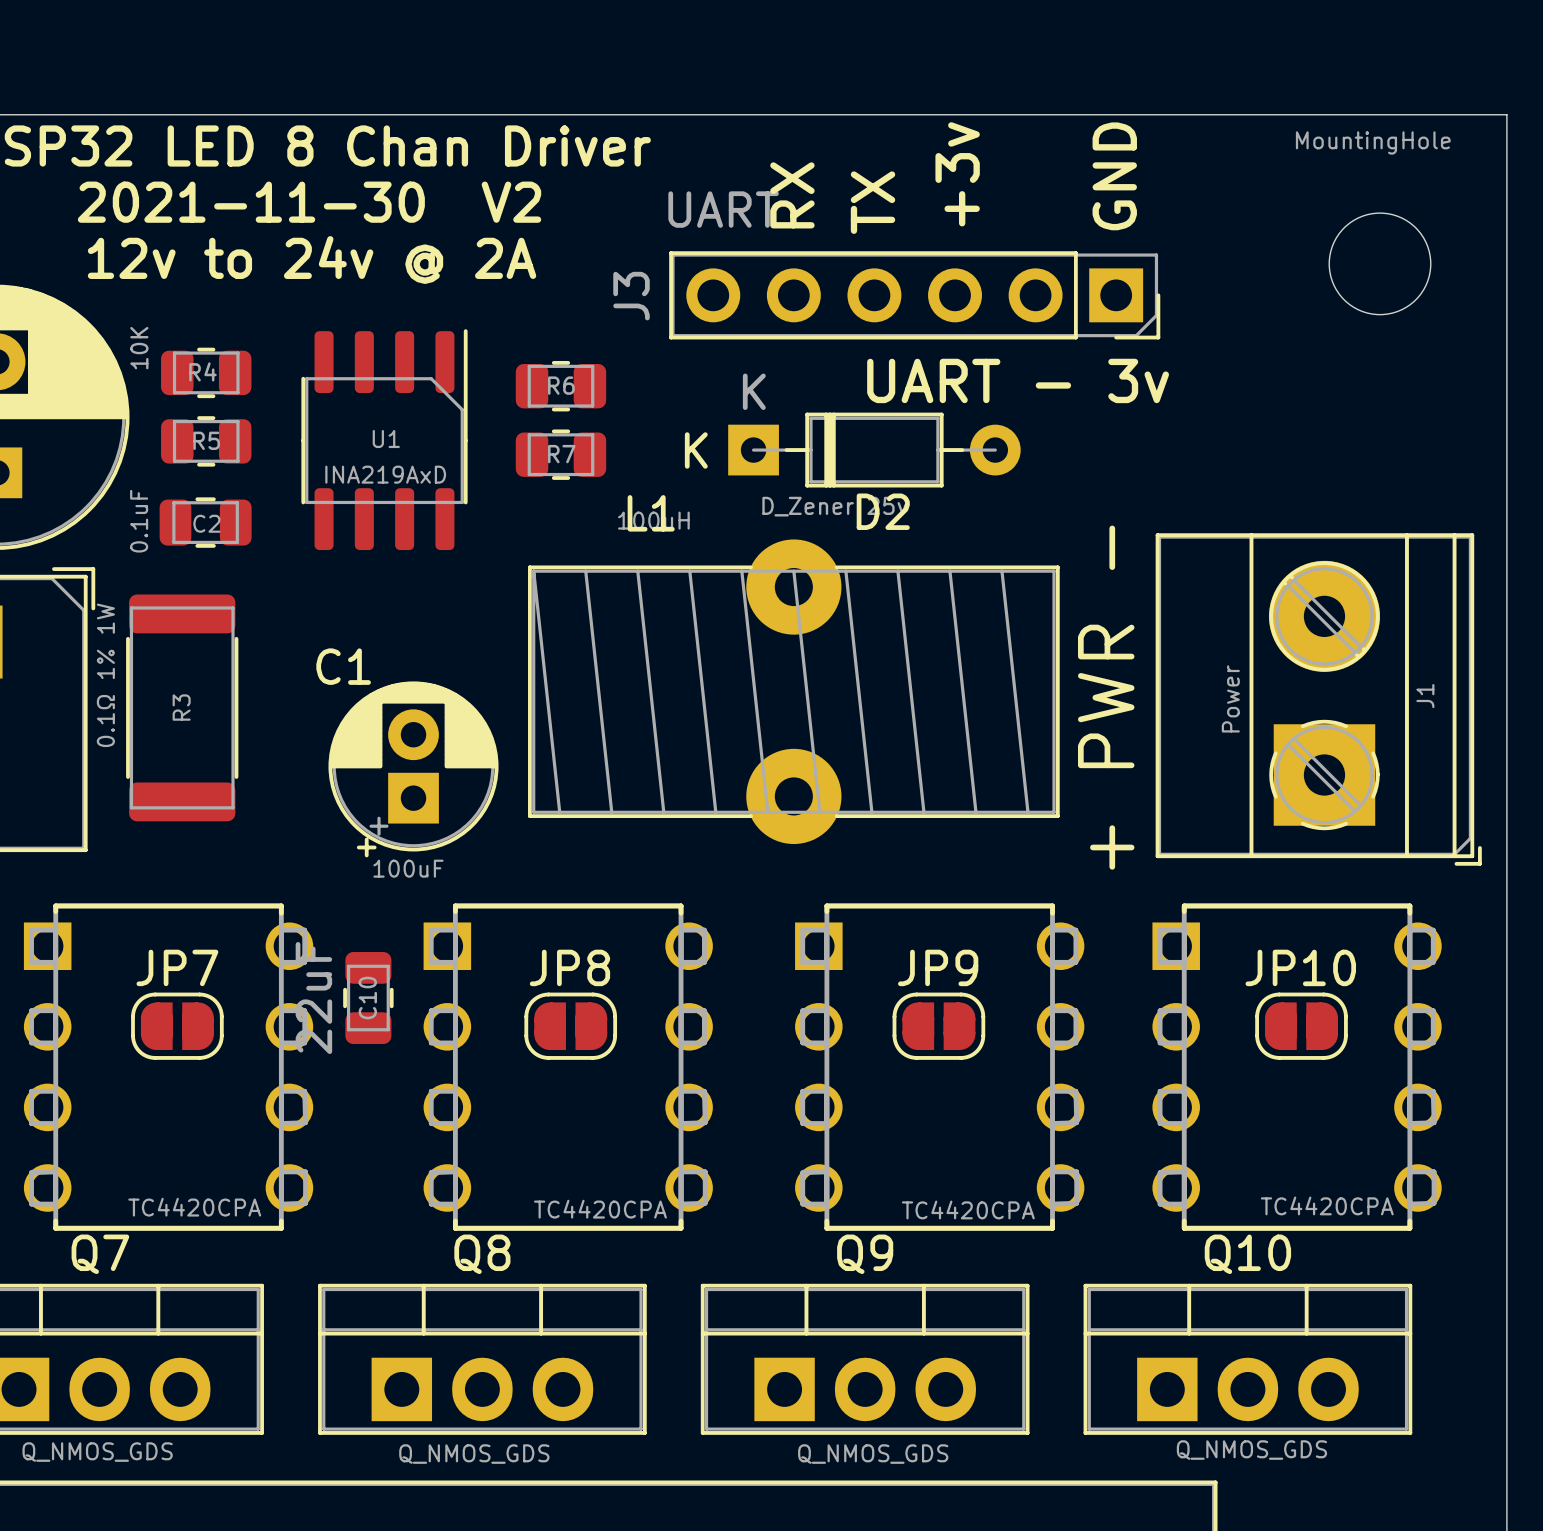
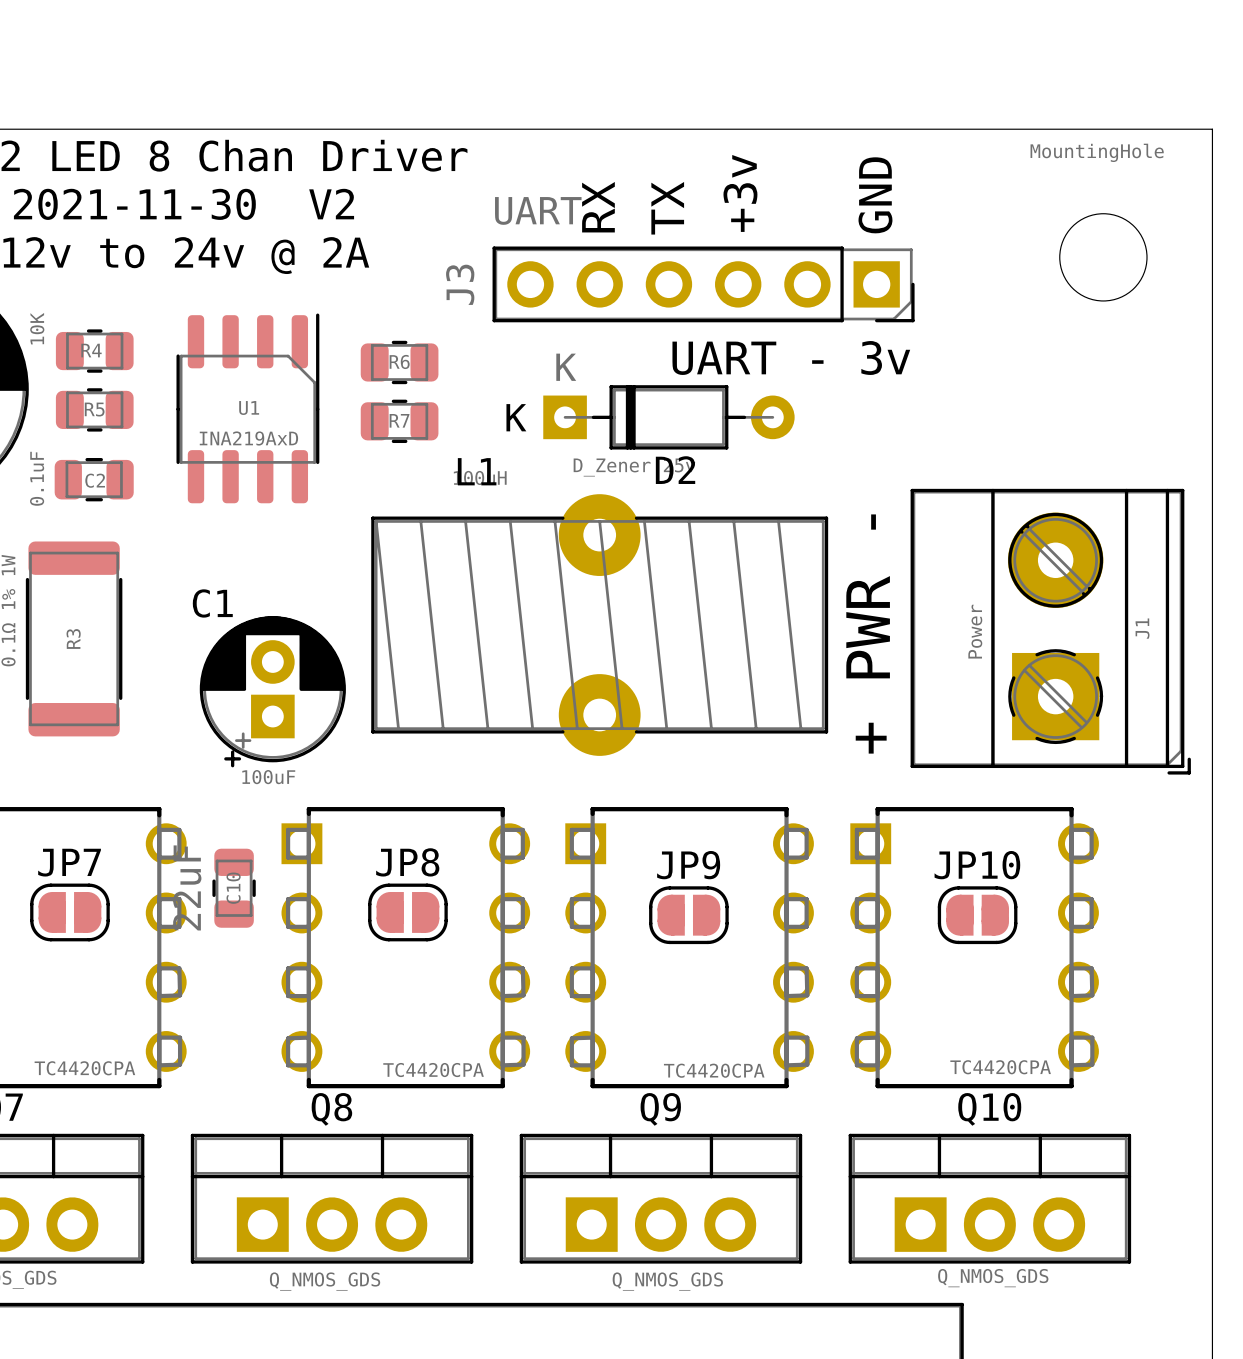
JP9 position: (938, 1026) -> (688, 915)
JP10 position: (1301, 1026) -> (977, 915)
part position: (939, 1067) -> (689, 947)
part position: (1297, 1067) -> (974, 947)

